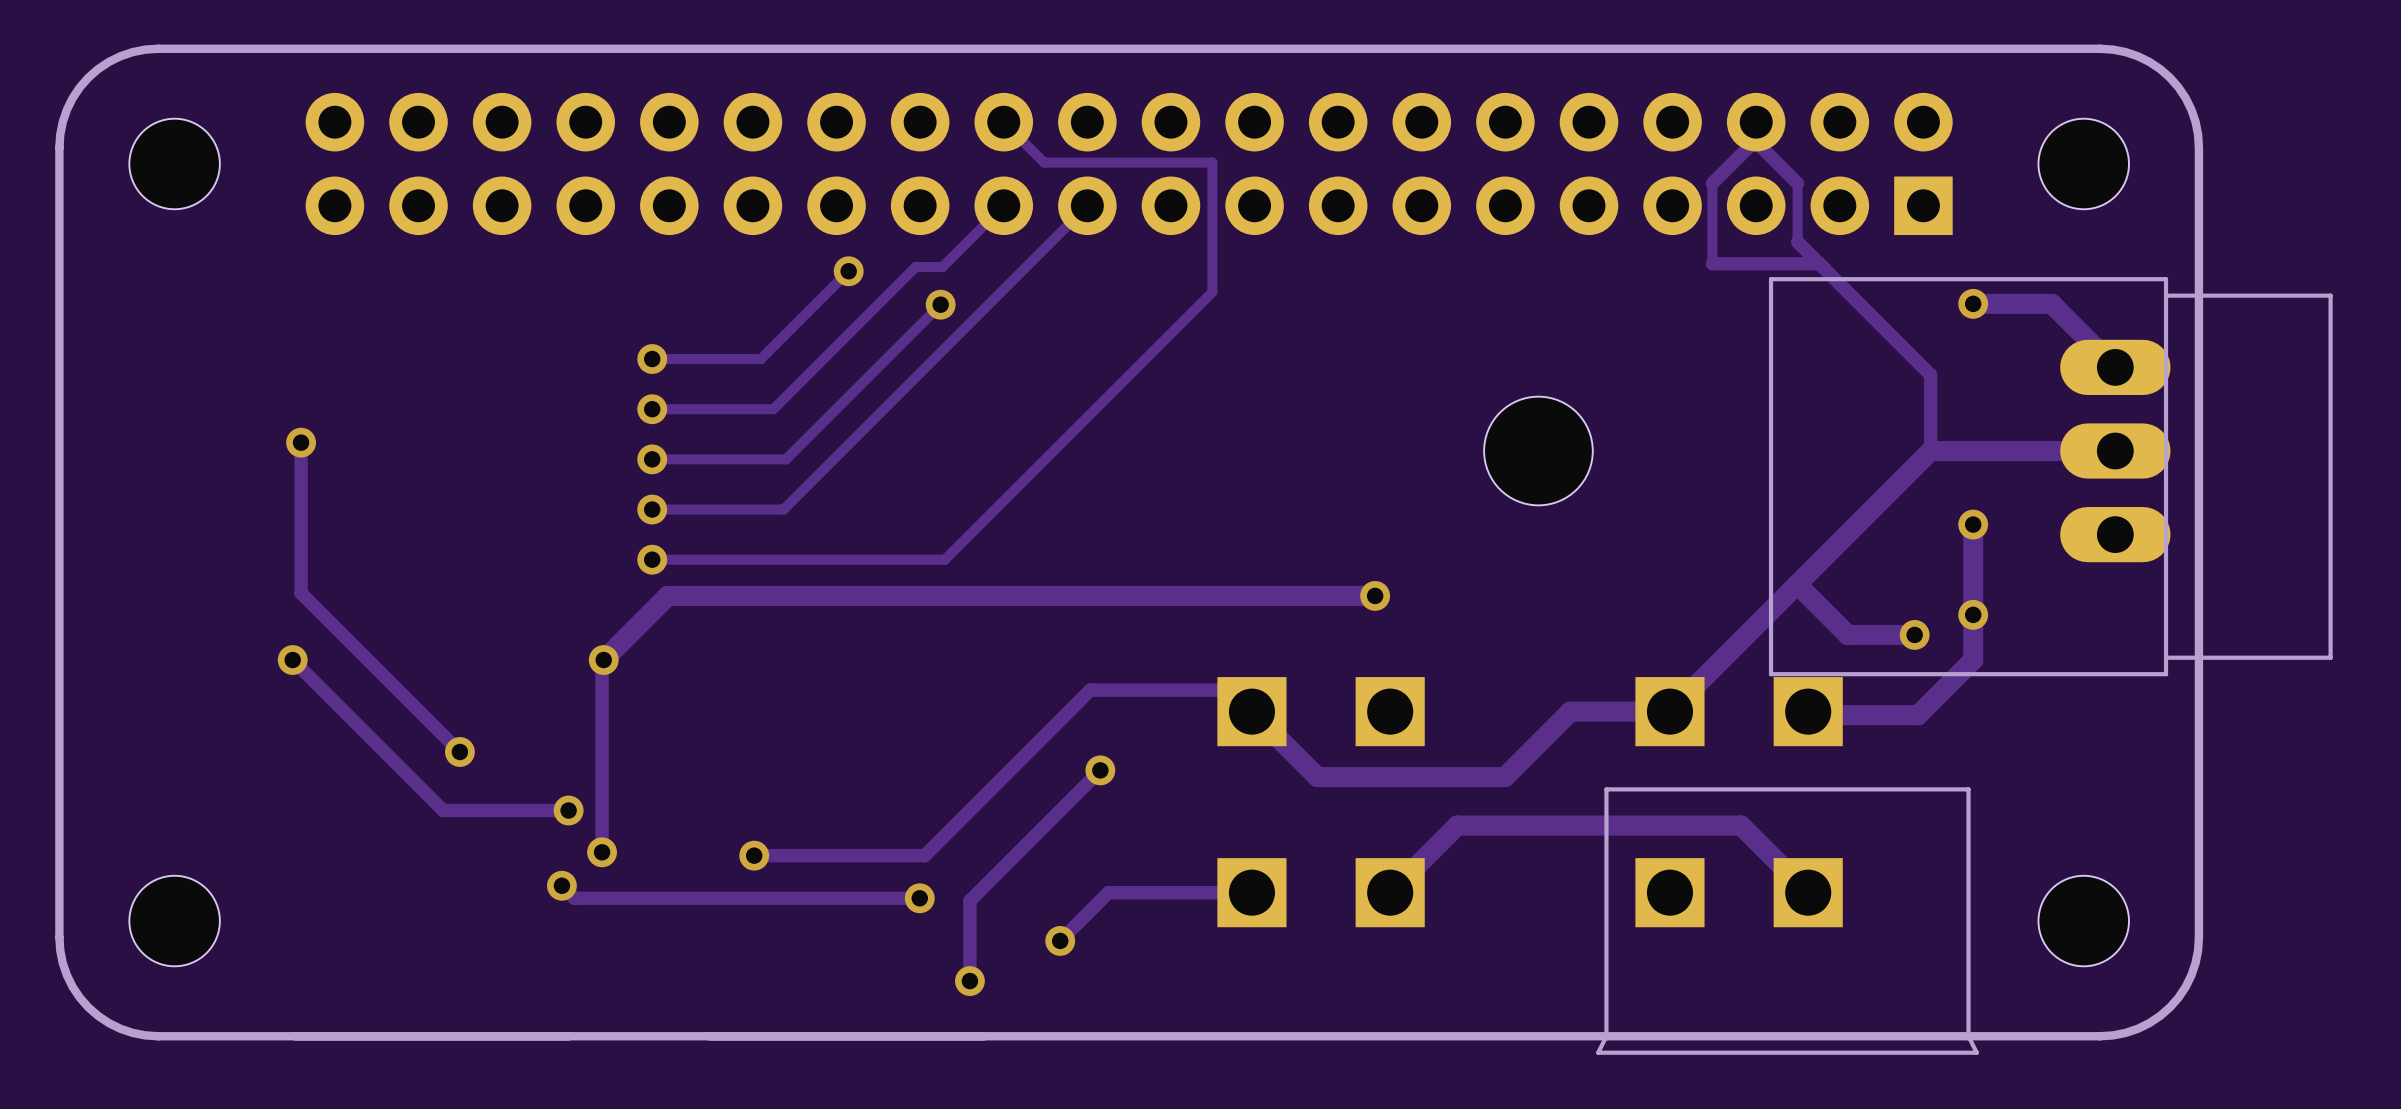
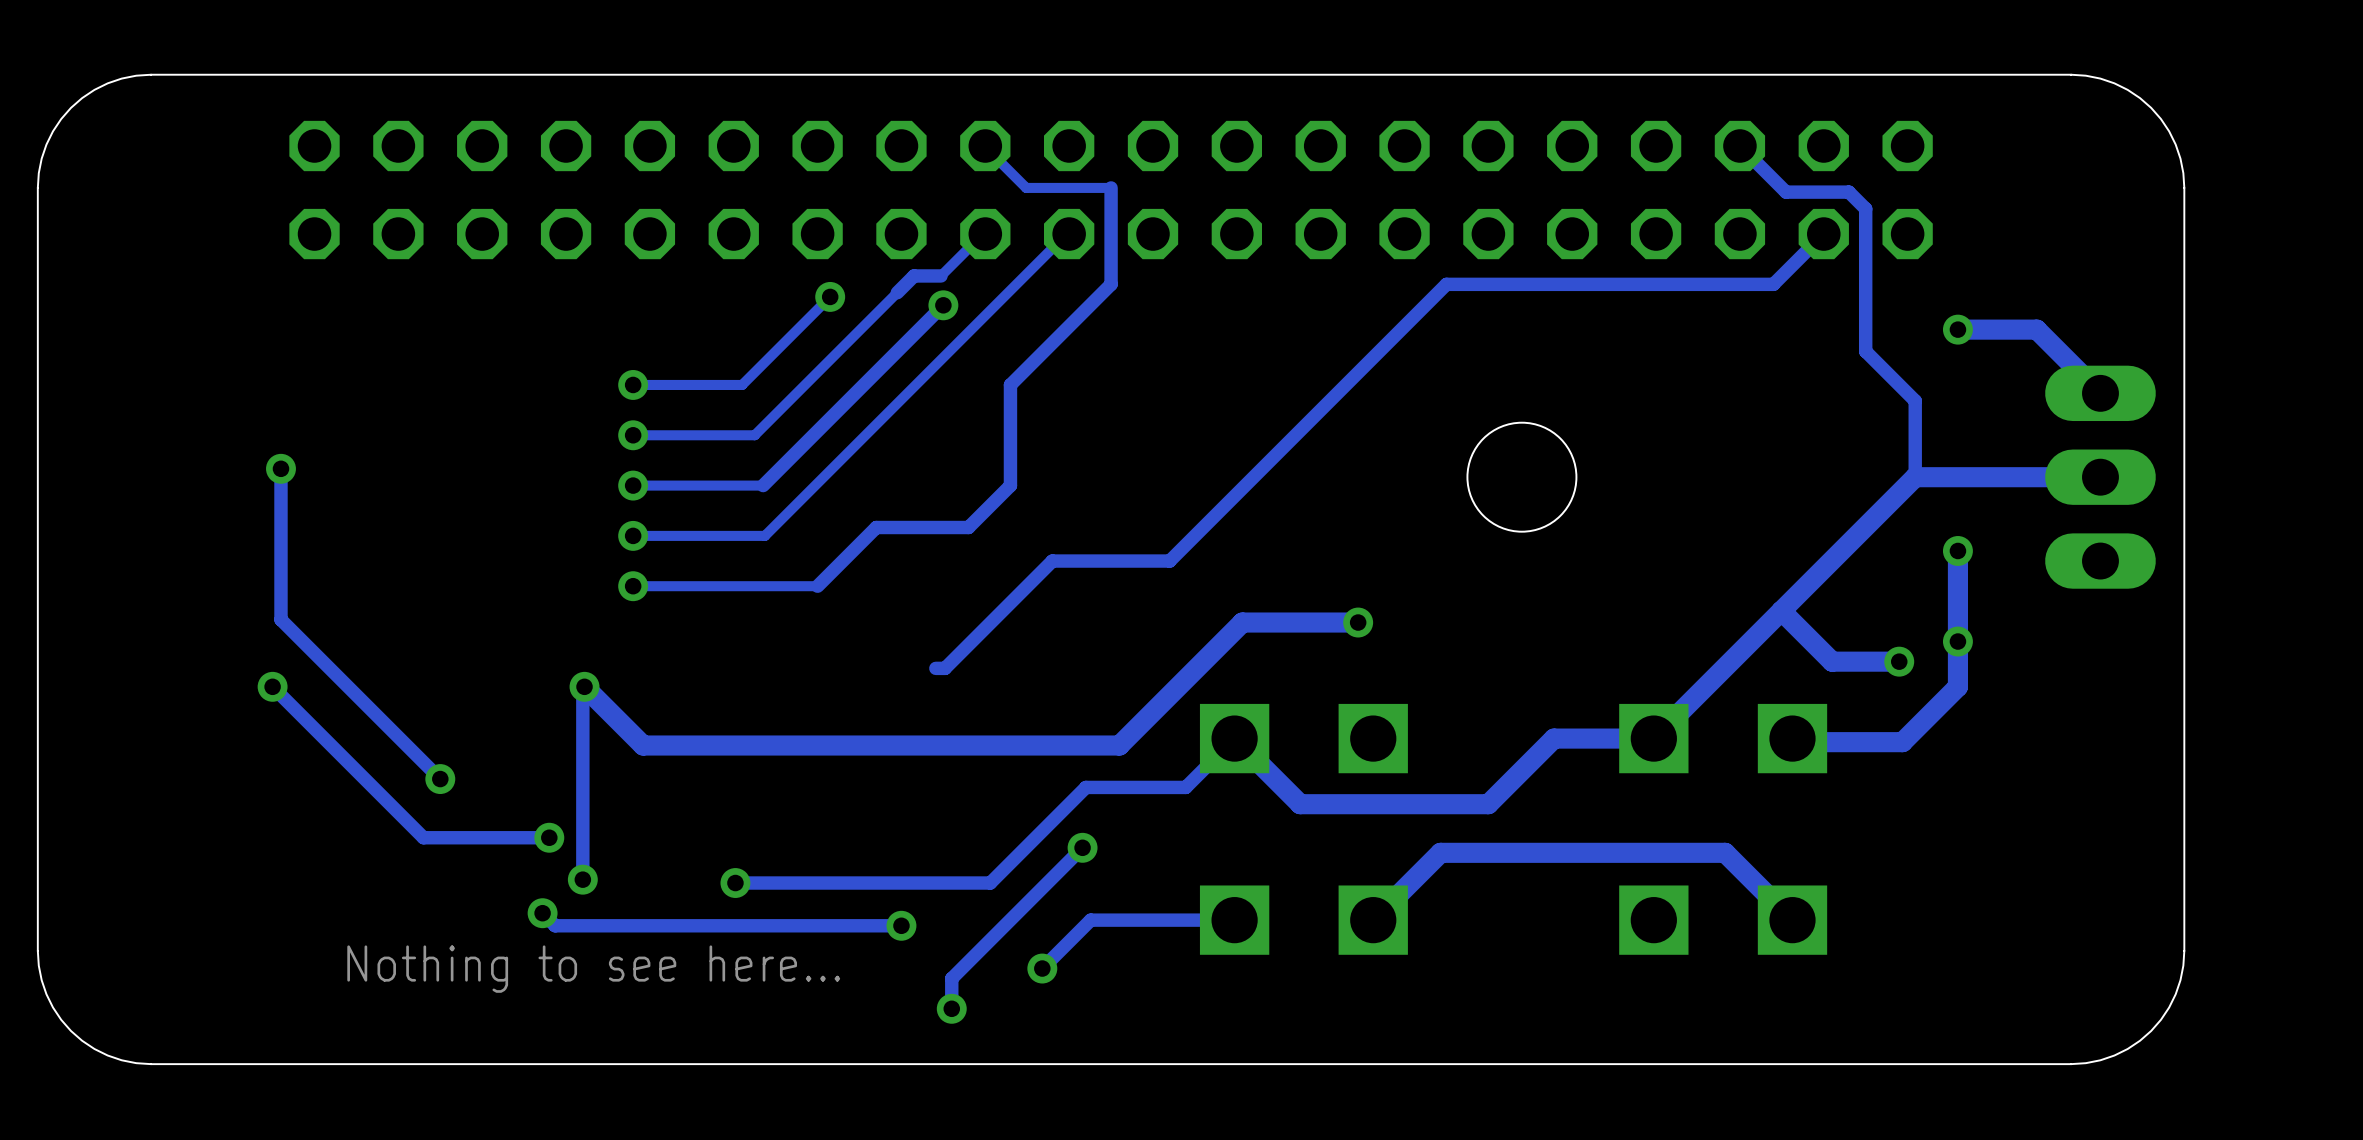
board edge: none -> (2071, 74) (151, 74) (136, 75) (107, 83) (82, 98) (61, 119) (46, 144) (38, 173) (37, 950) (38, 965) (46, 994) (53, 1007) (70, 1030) (94, 1048) (121, 1060) (151, 1064) (2071, 1064) (2085, 1063) (2114, 1055) (2140, 1040) (2160, 1019) (2175, 994) (2183, 965) (2184, 187) (2183, 173) (2175, 144) (2169, 131) (2151, 107) (2127, 89) (2114, 83) (2085, 75) (2071, 74)
part: none -> (1111, 146)
track: (1756, 122) (1756, 142) (1797, 183) (1797, 241) (1881, 325) -> (1739, 146) (1786, 192) (1848, 192) (1865, 208) (1865, 351)
track: (1756, 139) (1712, 183) (1712, 263) (1819, 263) -> none
track: (1128, 162) (1212, 162) (1212, 292) (944, 559) (836, 559) -> (1111, 187) (1111, 284) (1010, 384) (1010, 485) (968, 527) (876, 527) (817, 586)
part: none -> (1111, 234)
track: none -> (1823, 234) (1773, 284) (1446, 284) (1169, 561) (1052, 561) (945, 668) (935, 668)
track: (959, 250) (942, 267) (915, 267) -> (941, 275) (914, 275) (897, 292)
track: (940, 304) (785, 459) (781, 459) -> (943, 305) (763, 485)
via position: (940, 304) -> (943, 305)
part: (1193, 549) -> none
track: (1259, 595) (667, 595) (603, 660) -> (1242, 622) (1119, 745) (643, 745) (584, 686)
track: (1251, 711) (1230, 690) (1090, 690) (924, 855) -> (1234, 738) (1185, 787) (1085, 787) (990, 883) (906, 883)
track: (1100, 770) (969, 900) (969, 950) -> (1082, 847) (951, 978)
via position: (1100, 770) -> (1082, 847)
text: none -> Nothing to see here... (593, 969)

